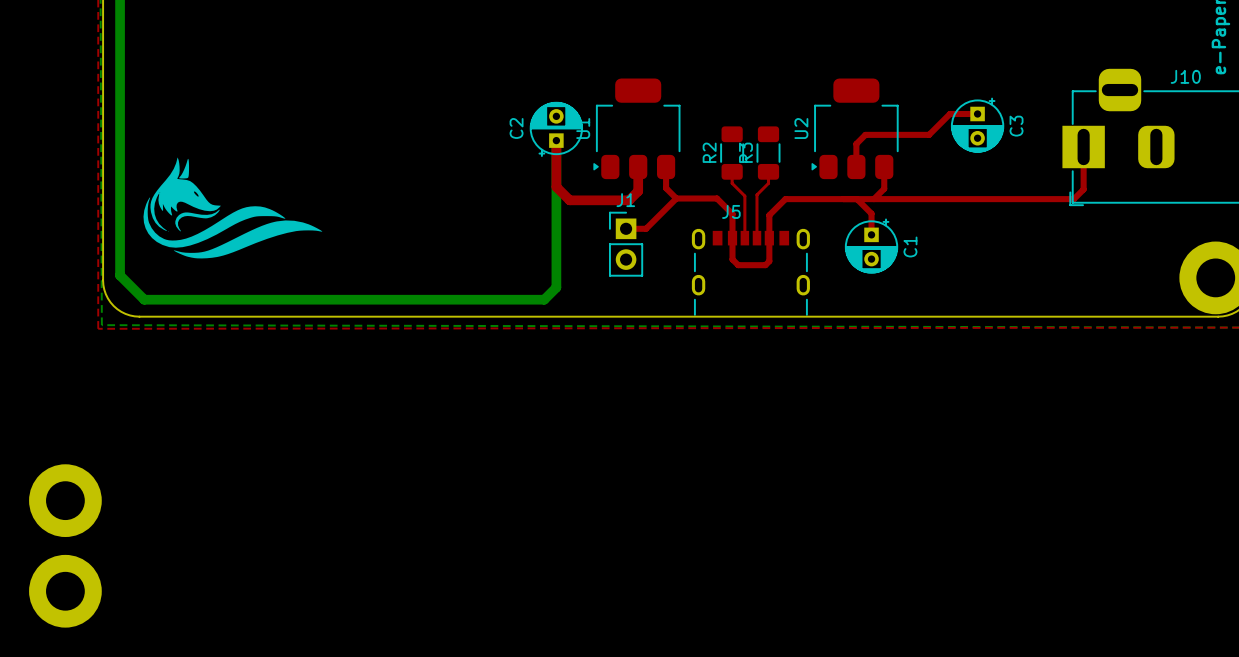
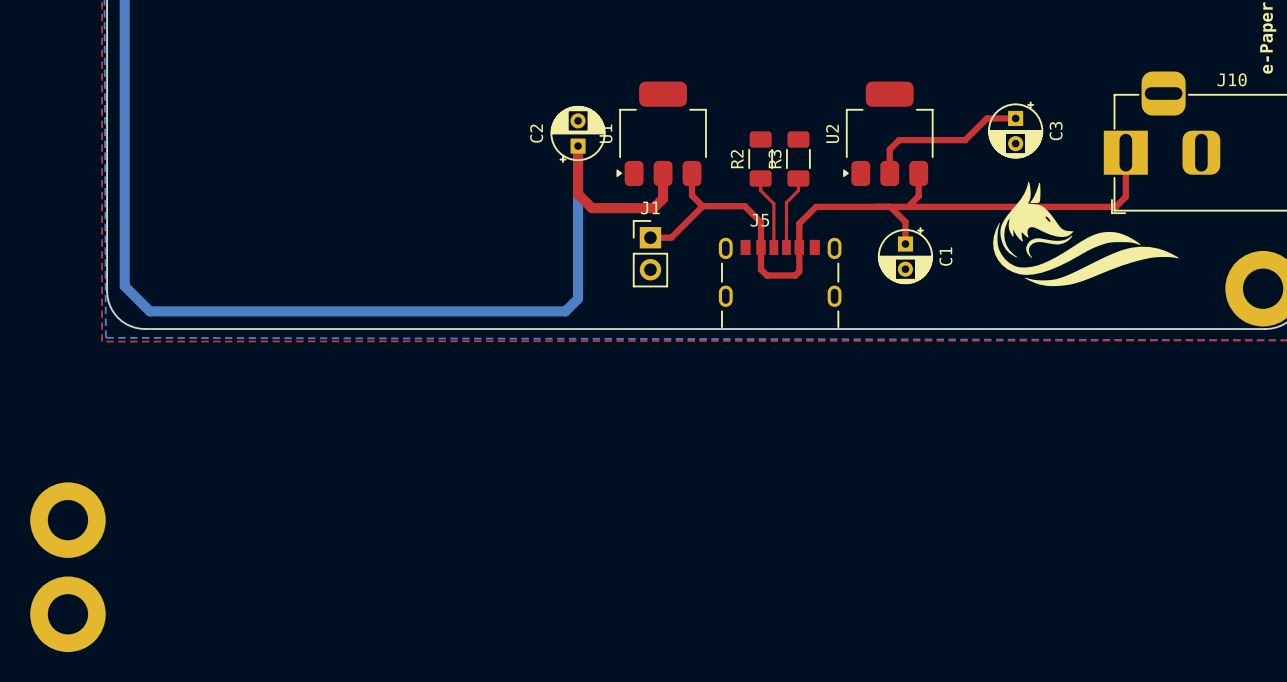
drawing: [143, 157, 323, 259] -> none
drawing: none -> [993, 181, 1179, 287]

